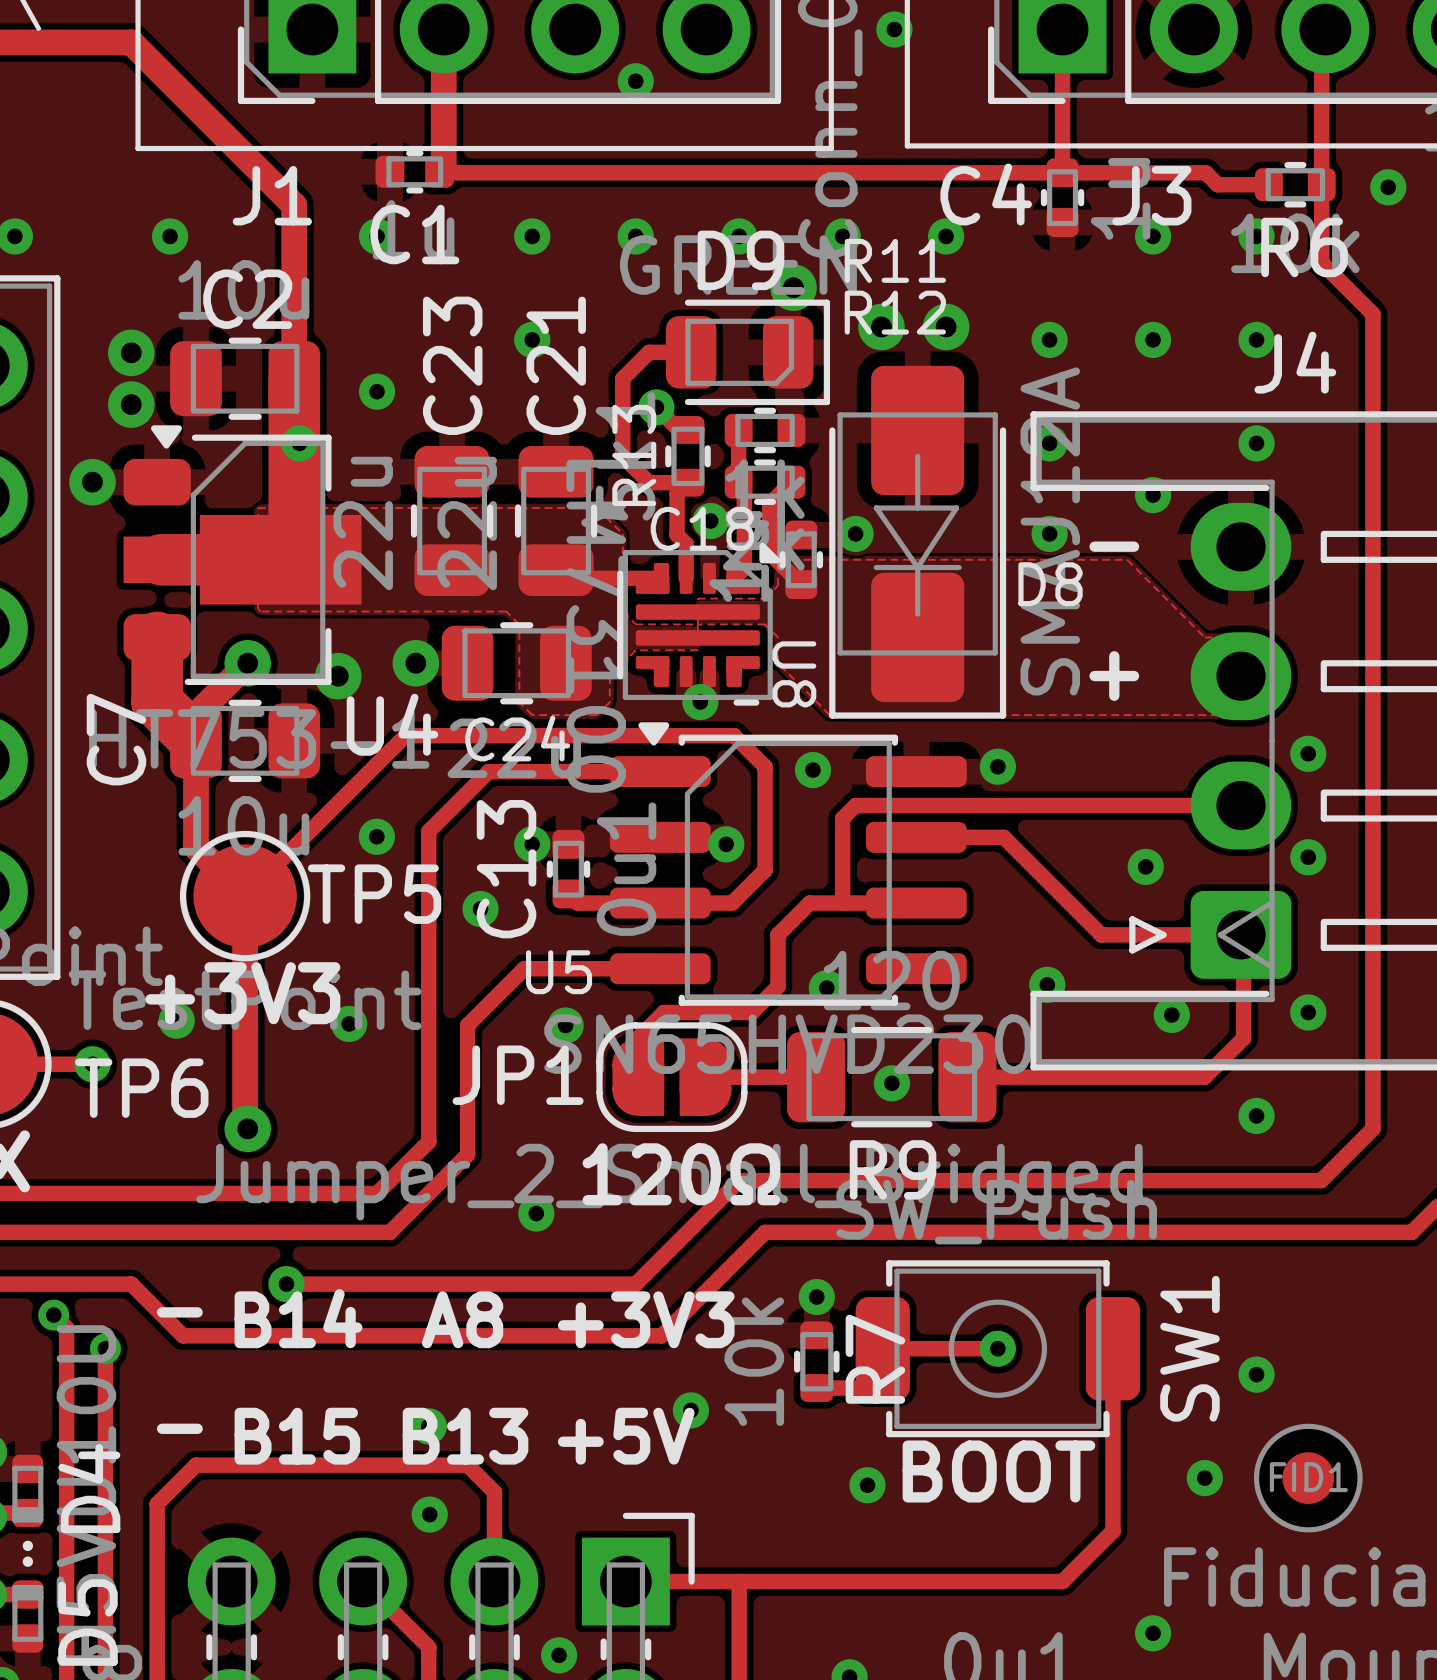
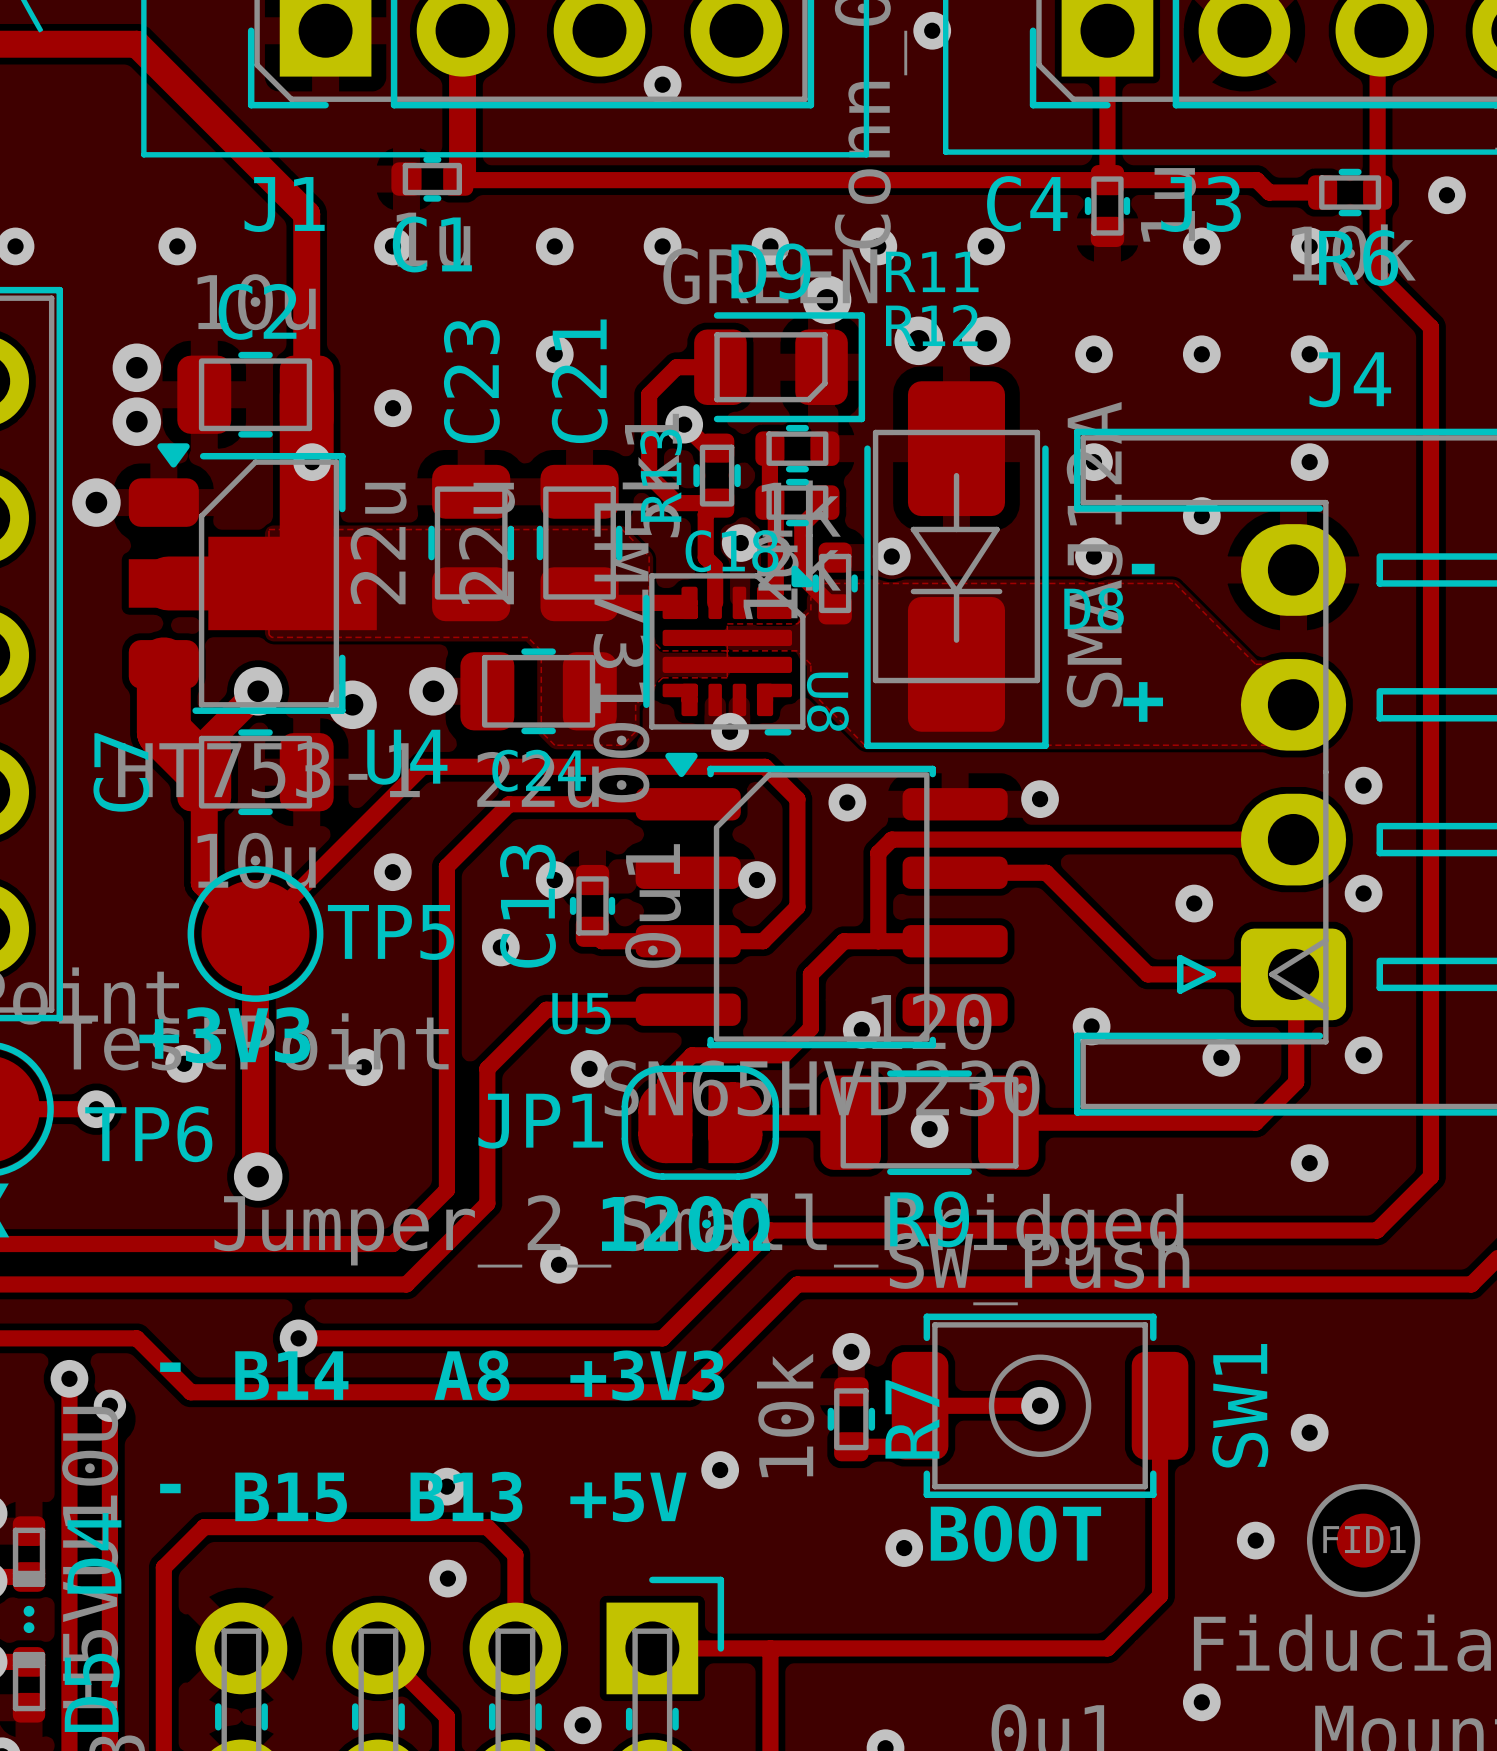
via position: (53, 1315) -> (69, 1378)

